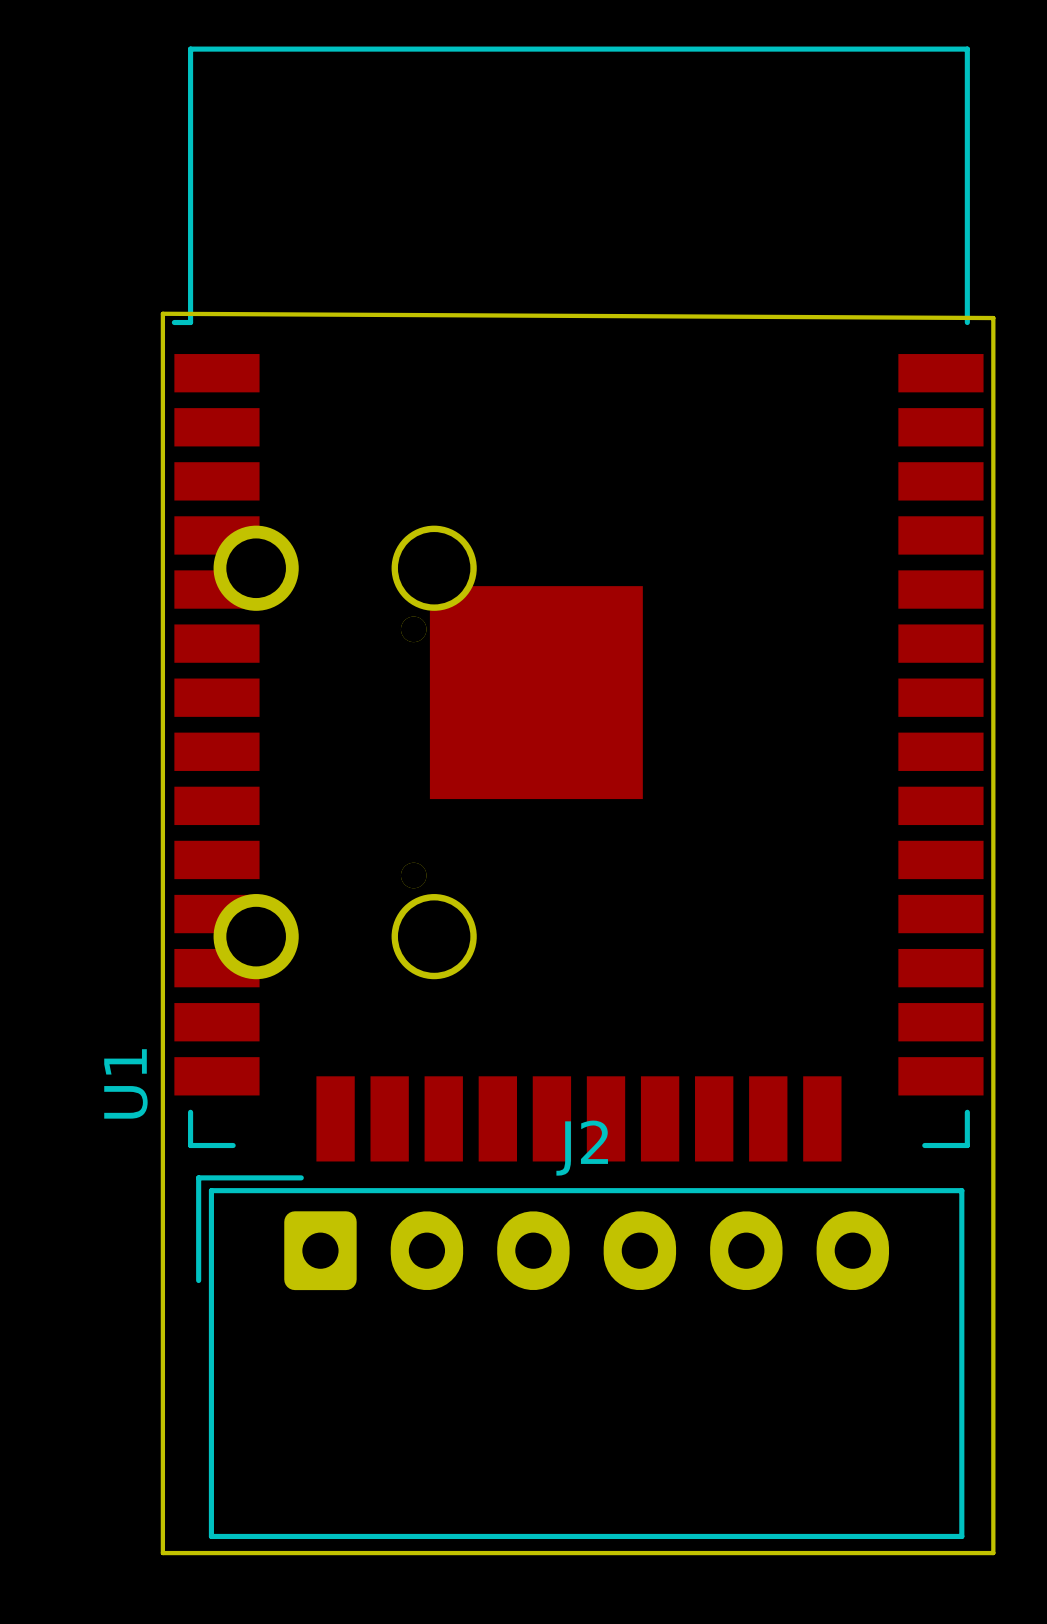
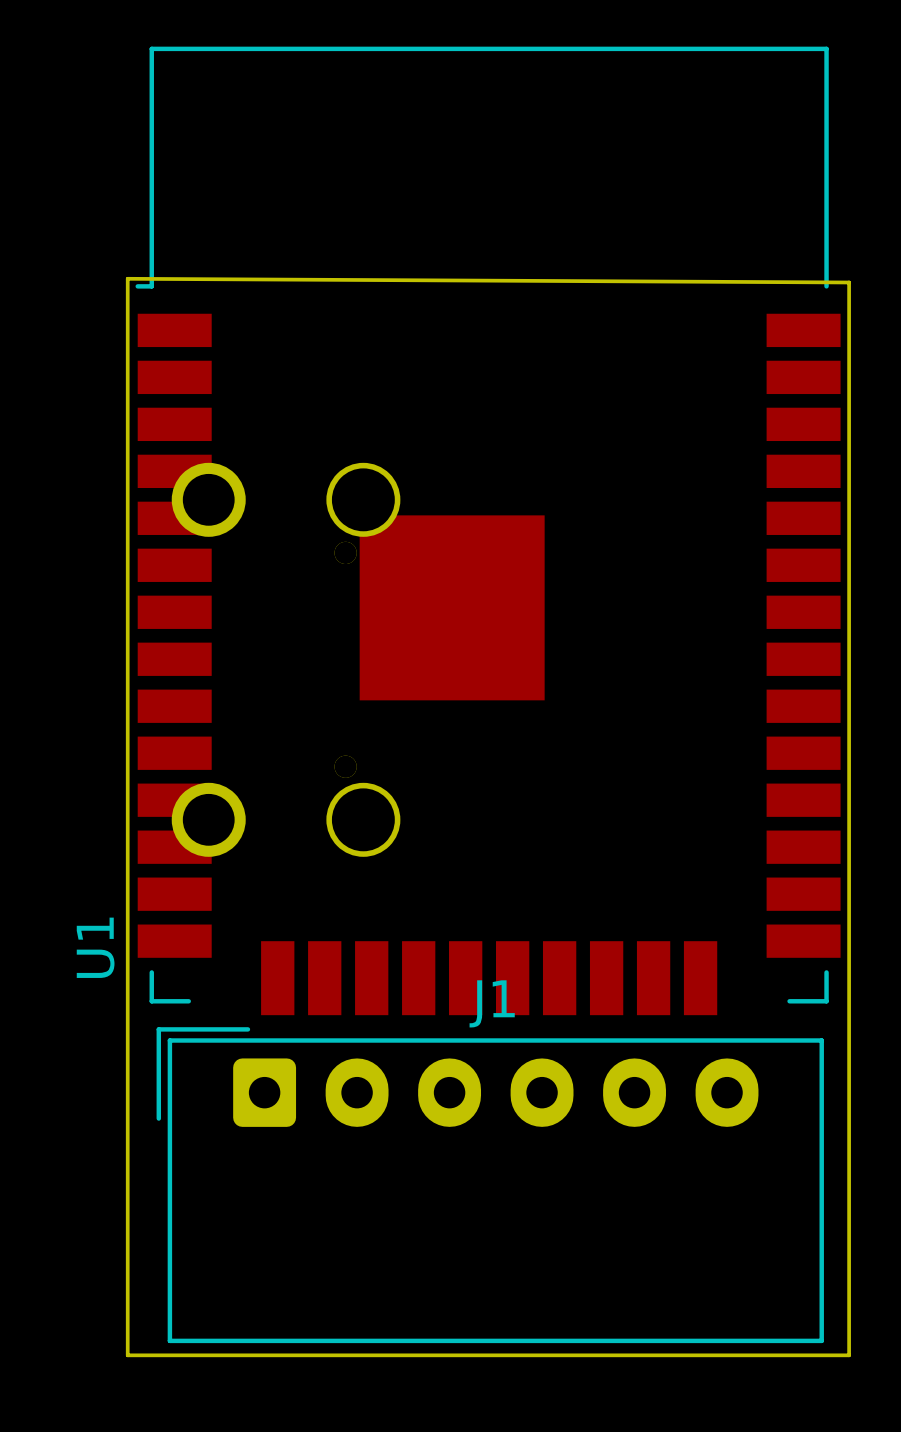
J2 name: J2 (582, 1148) -> J1 (492, 1003)

